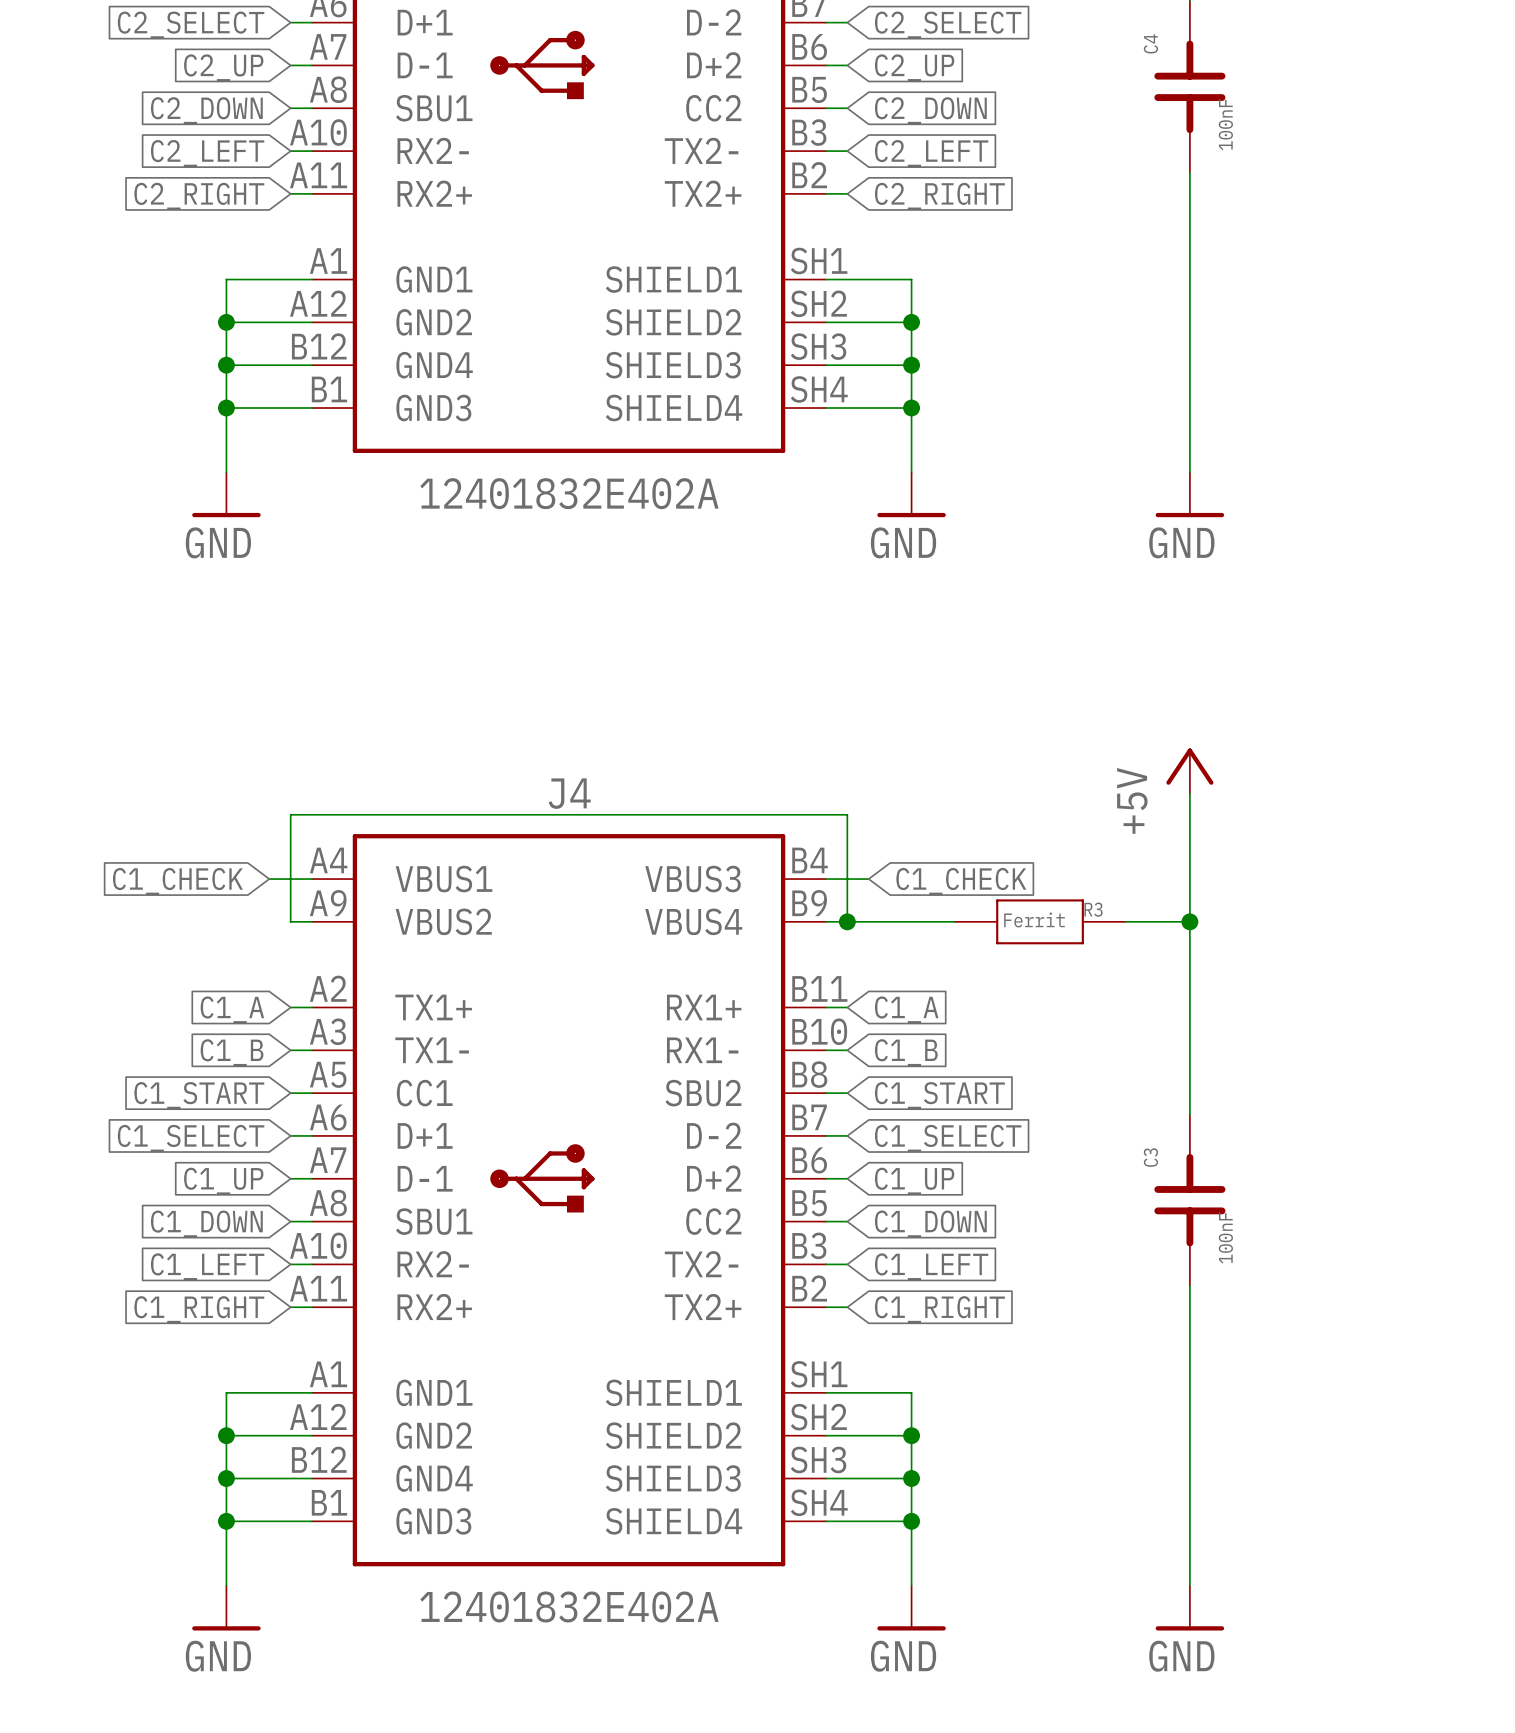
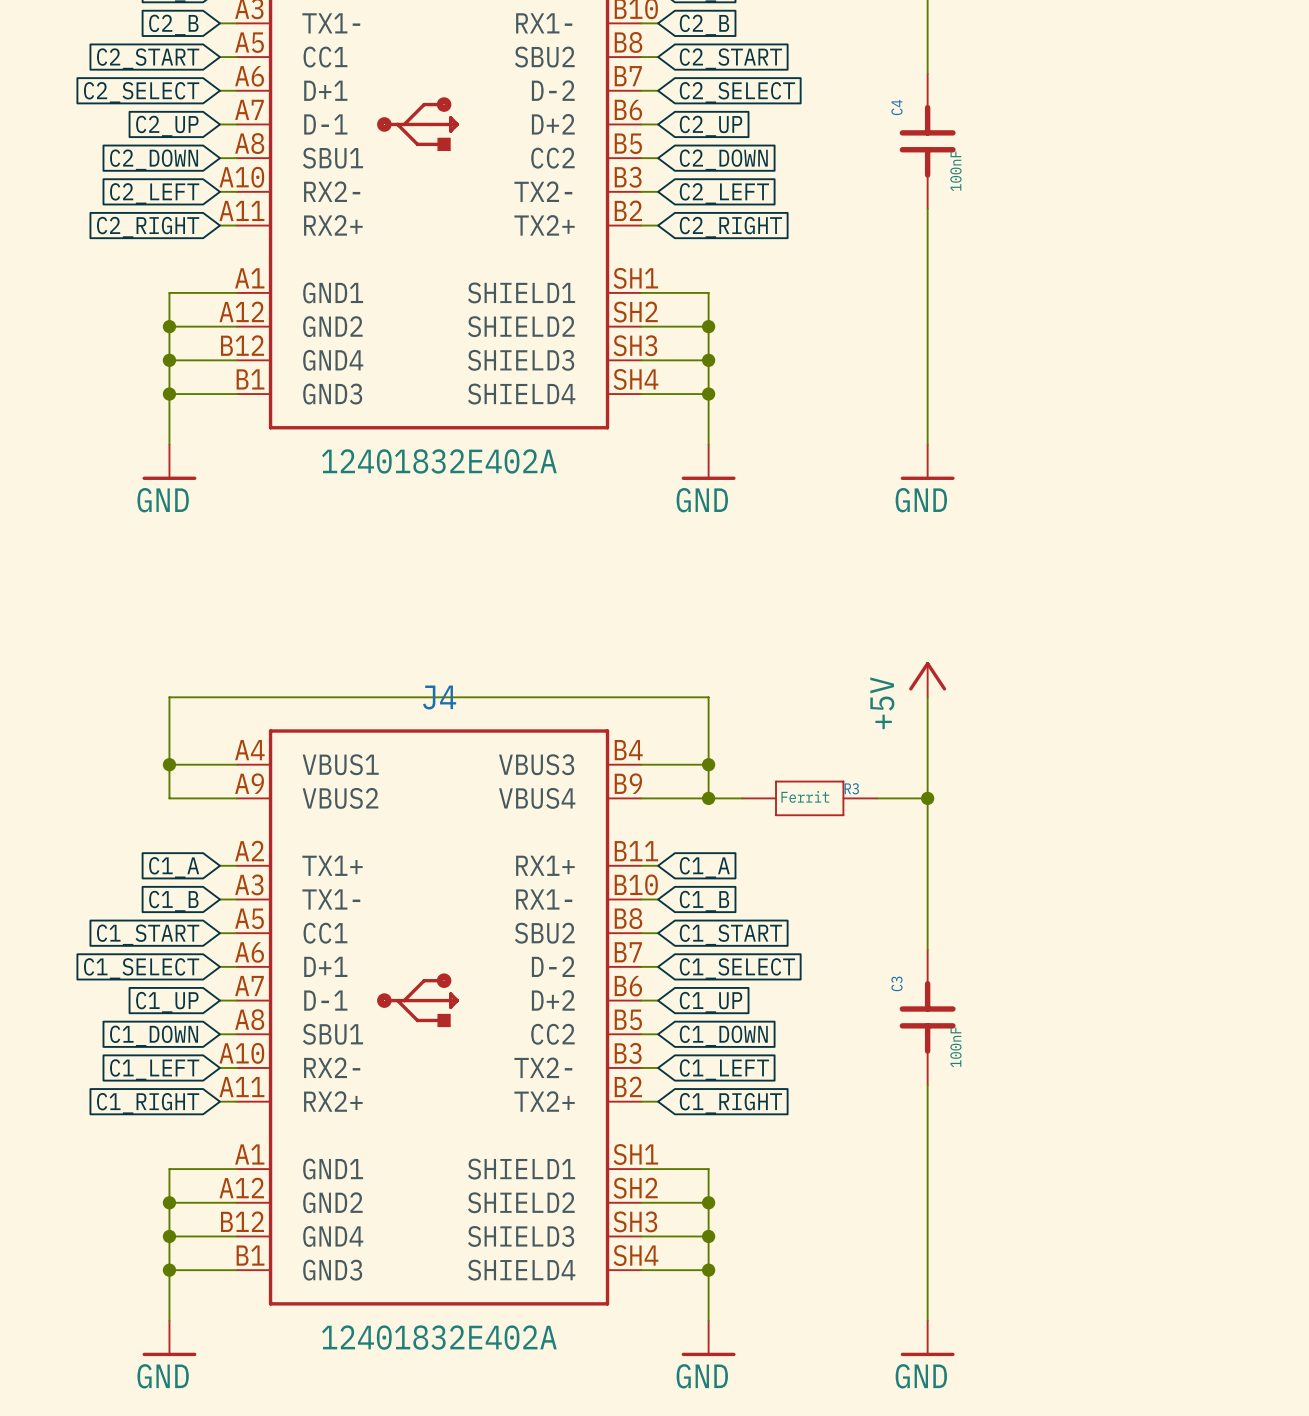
wire: none -> (169, 764) (203, 764)
junction: none -> (169, 764)
wire: none -> (674, 764) (708, 764)
junction: none -> (708, 764)
global label: C1_CHECK (177, 881) -> none
global label: C1_CHECK (961, 881) -> none
wire: (290, 921) (290, 814) (847, 814) (847, 921) -> (220, 798) (169, 798) (169, 697) (708, 697) (708, 798)
junction: (847, 921) -> none
junction: none -> (708, 798)

